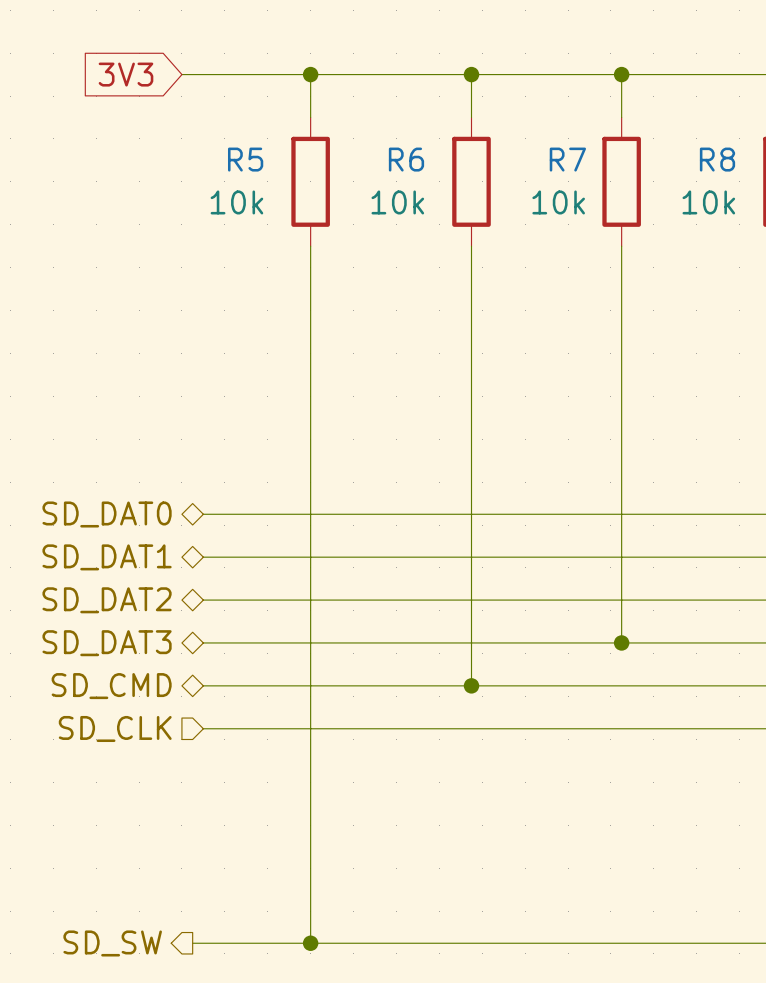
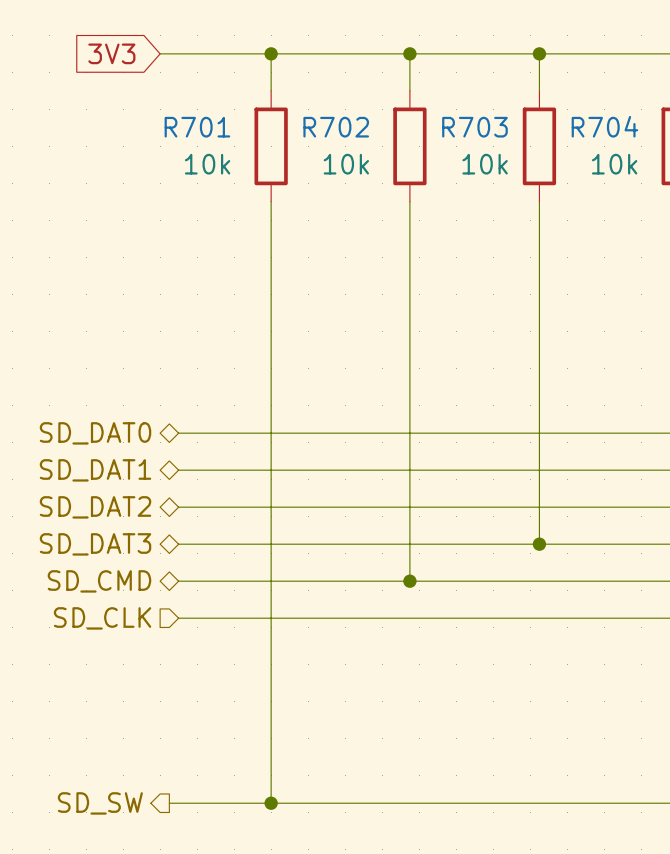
R5 name: R5 (245, 159) -> R701 (197, 127)
R6 name: R6 (406, 159) -> R702 (336, 127)
R7 name: R7 (567, 159) -> R703 (474, 127)
R8 name: R8 (717, 159) -> R704 (604, 126)

